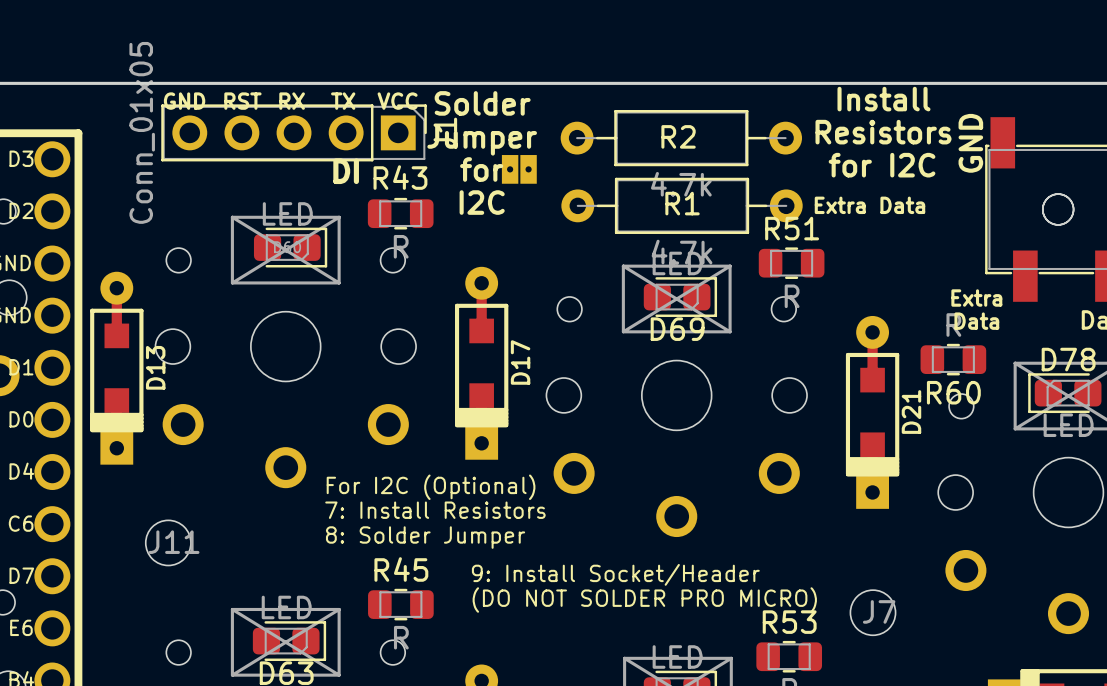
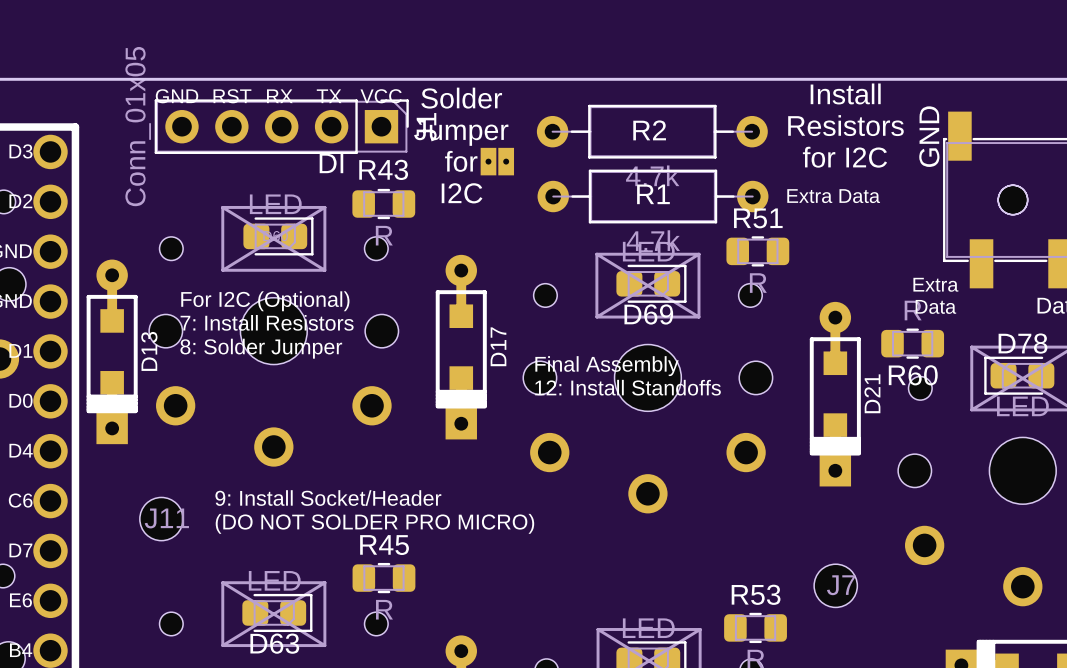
text: none -> Final Assembly (607, 366)
text: none -> 12: Install Standoffs (628, 387)
text position: For I2C (Optional) (431, 487) -> For I2C (Optional) (265, 301)
text position: 7: Install Resistors (435, 510) -> 7: Install Resistors (267, 322)
text position: 8: Solder Jumper (425, 537) -> 8: Solder Jumper (261, 348)
text position: 9: Install Socket/Header (615, 574) -> 9: Install Socket/Header (328, 498)
text position: (DO NOT SOLDER PRO MICRO) (644, 600) -> (DO NOT SOLDER PRO MICRO) (374, 523)

